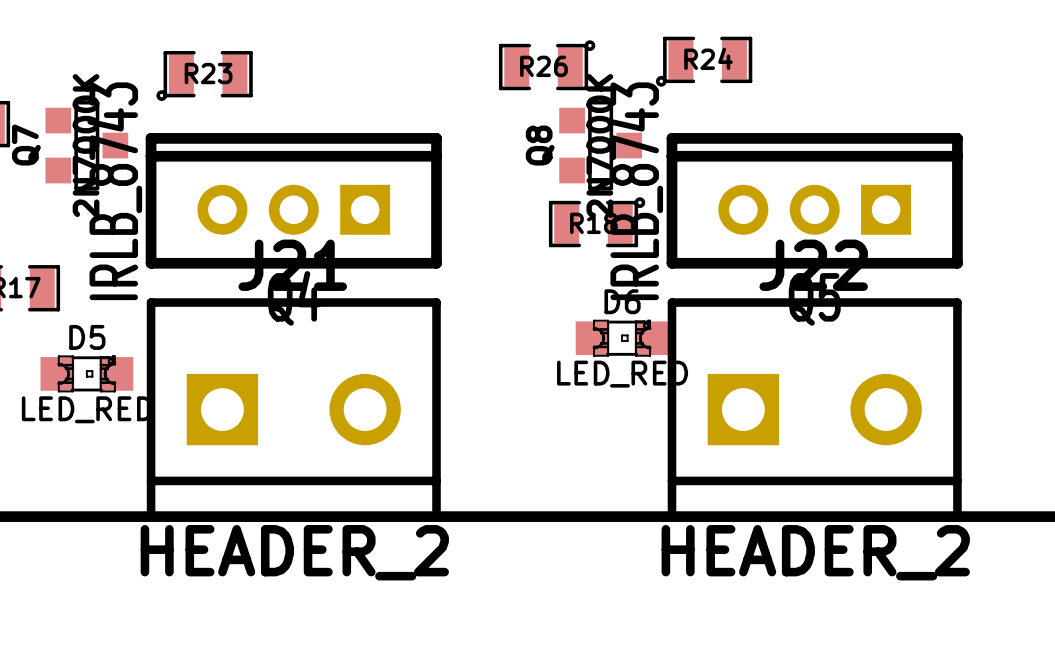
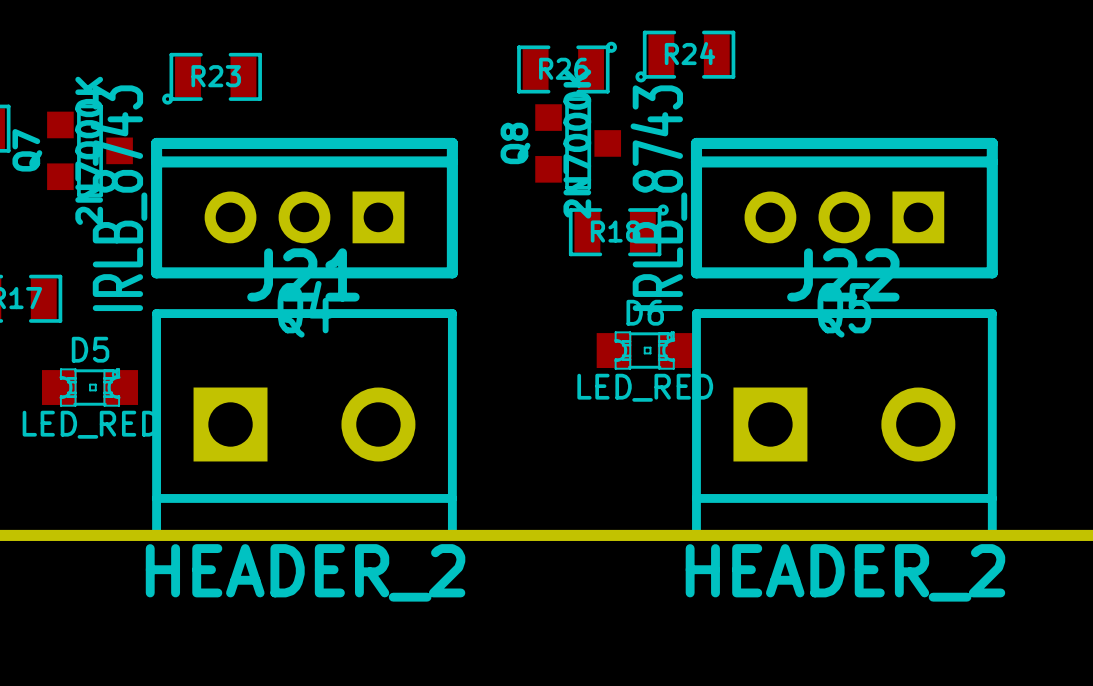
R24 position: (704, 61) -> (685, 56)
Q8 position: (600, 145) -> (578, 143)

